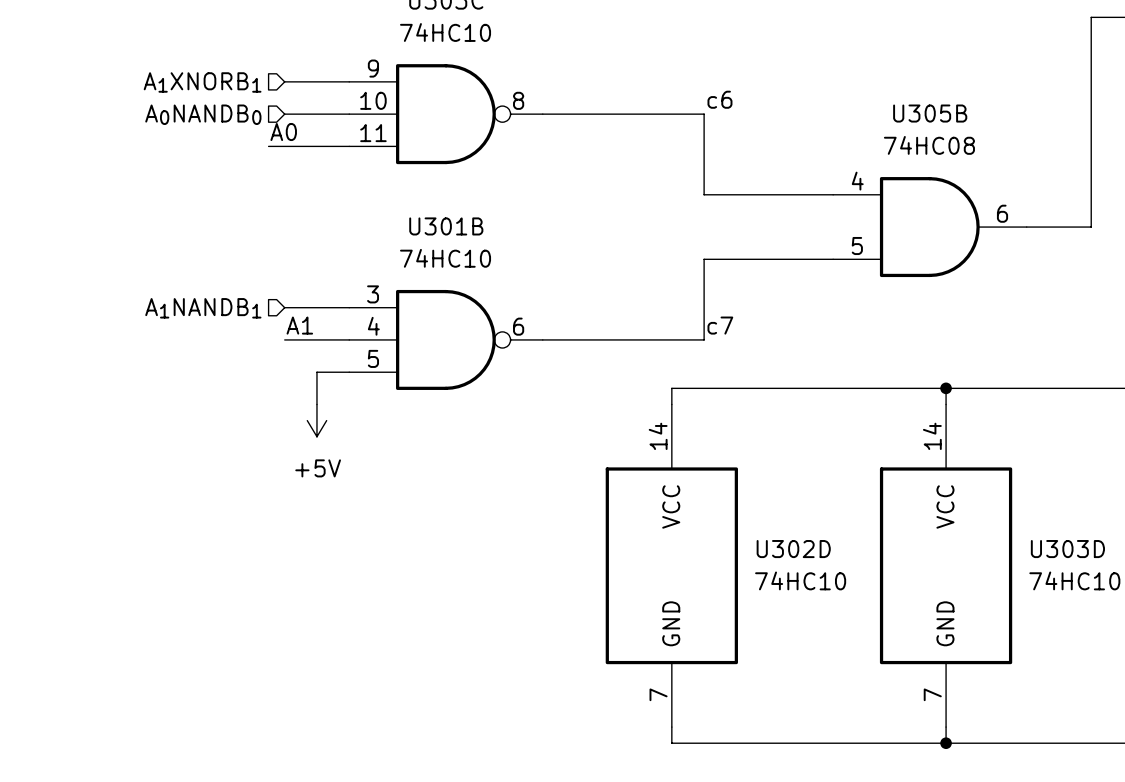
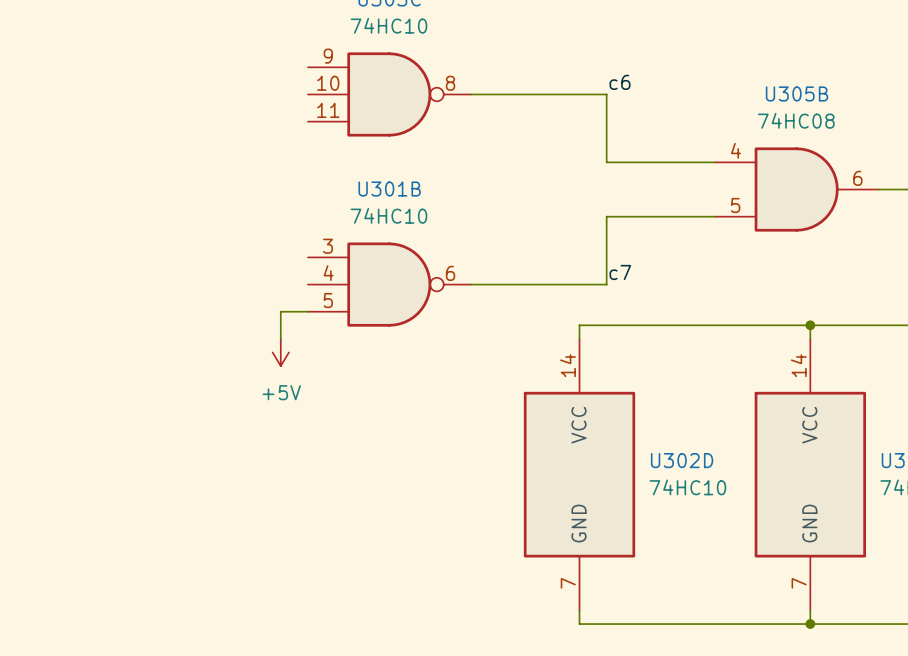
wire: (284, 81) (349, 81) -> none
hierarchical label: A1XNORB1 (202, 82) -> none
hierarchical label: A0NANDB0 (203, 114) -> none
wire: (284, 114) (349, 114) -> none
label: A0 (283, 132) -> none
wire: (268, 146) (349, 146) -> none
wire: (284, 307) (349, 307) -> none
hierarchical label: A1NANDB1 (203, 308) -> none
label: A1 (299, 325) -> none
wire: (284, 339) (349, 339) -> none

